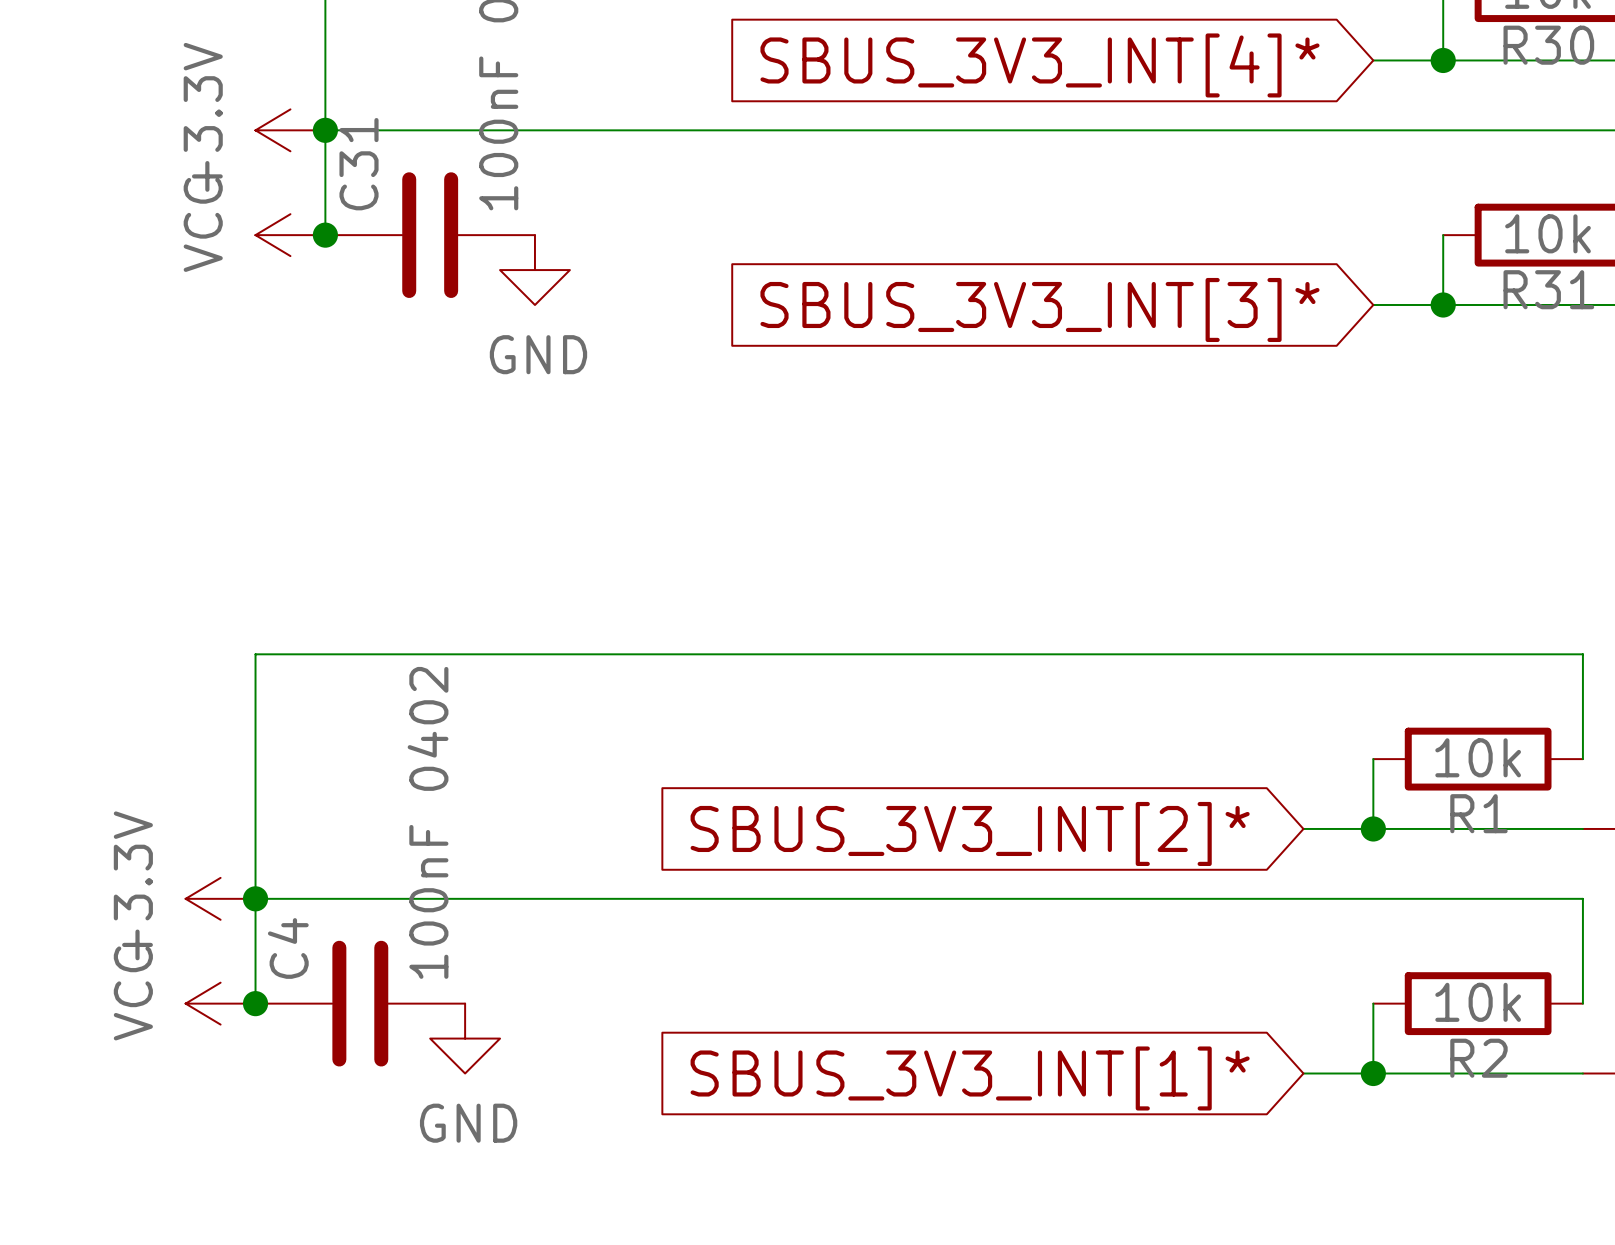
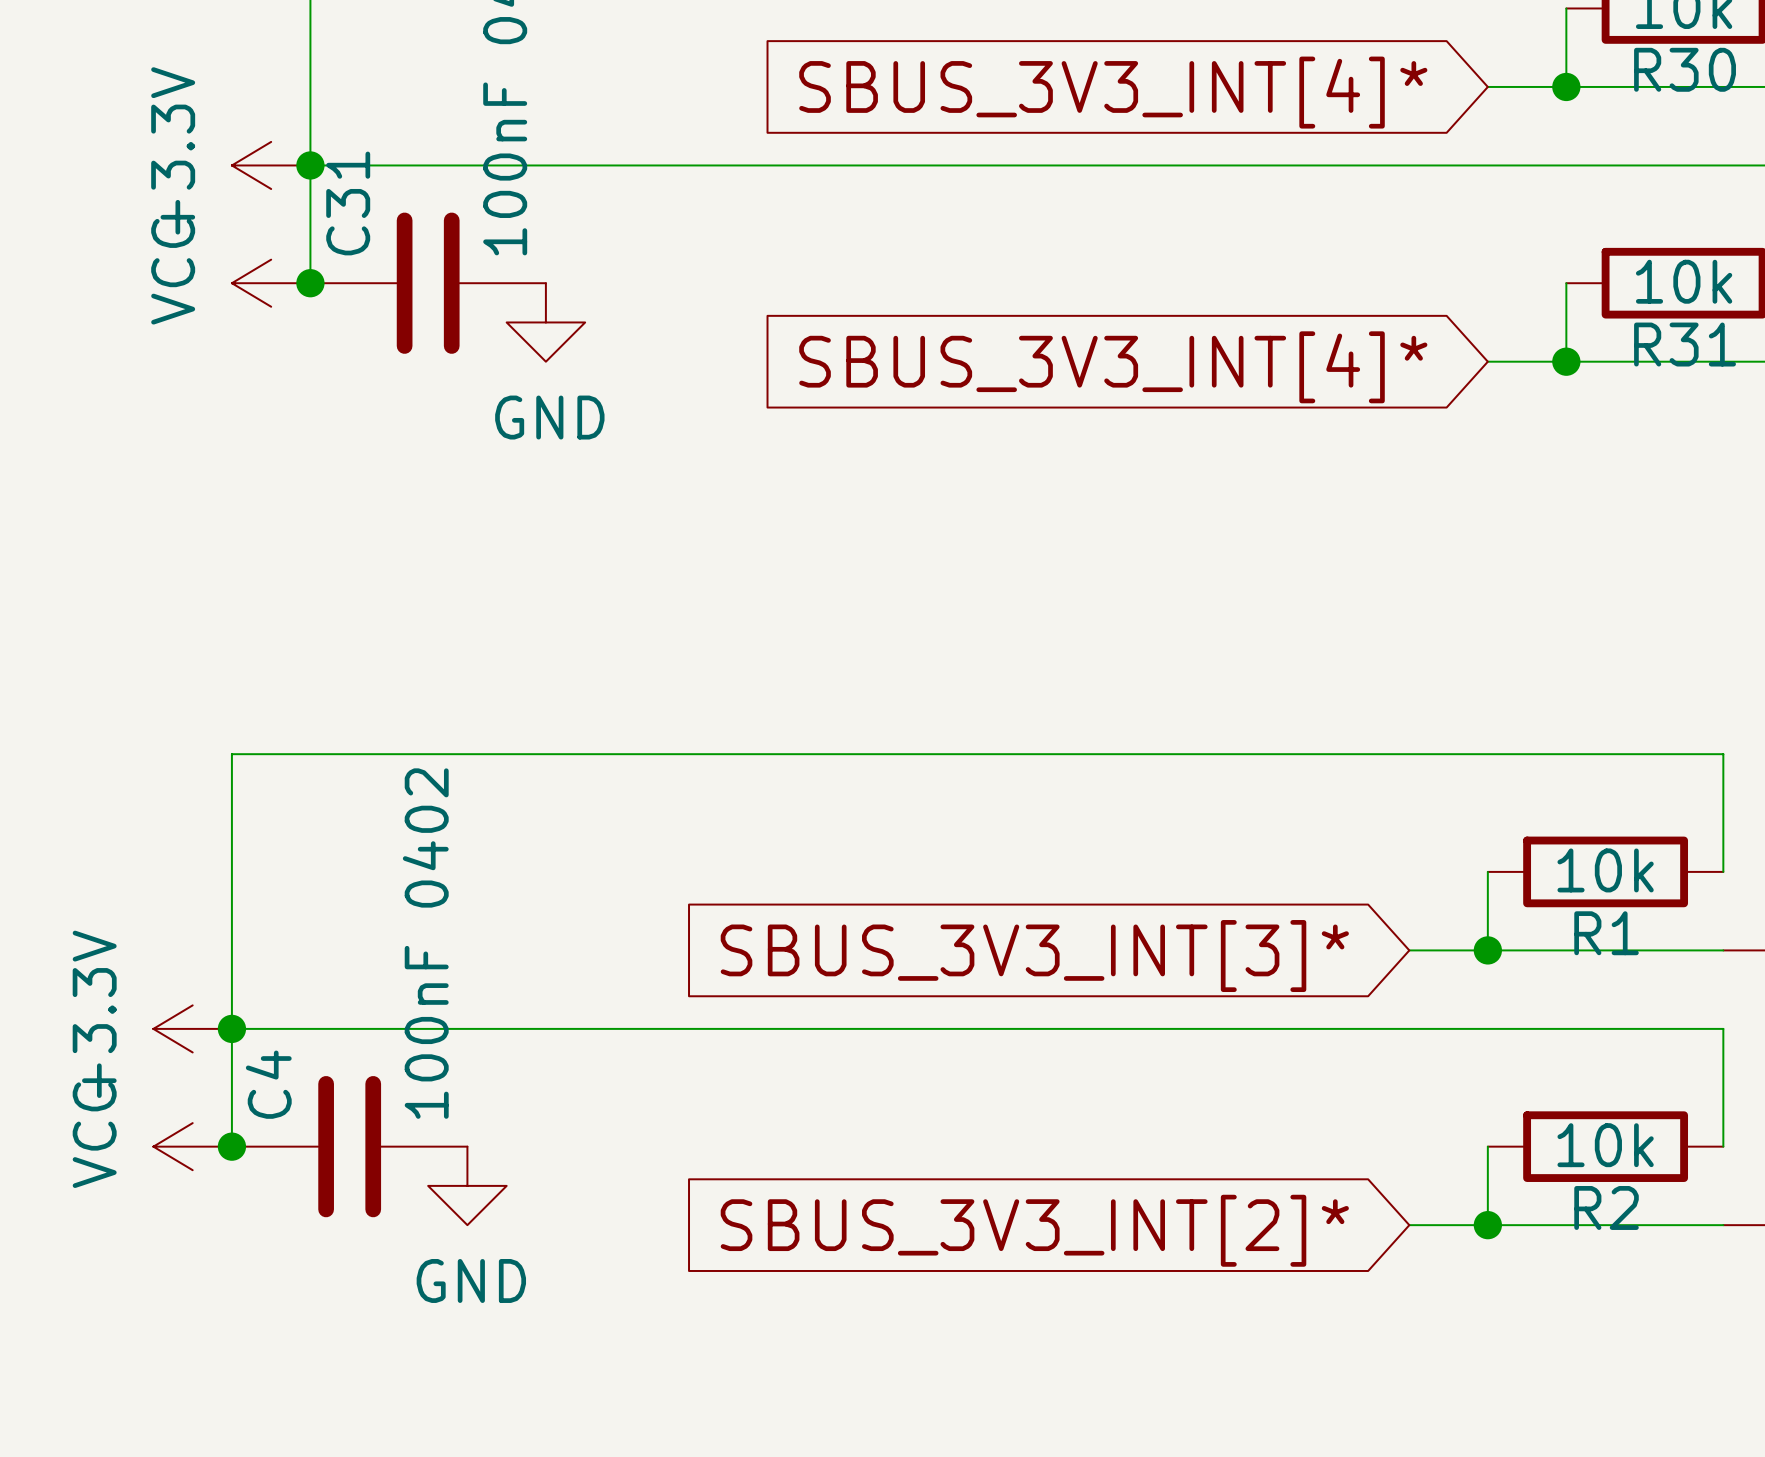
global label: SBUS_3V3_INT[3]* (1039, 309) -> SBUS_3V3_INT[4]* (1113, 367)
global label: SBUS_3V3_INT[2]* (970, 833) -> SBUS_3V3_INT[3]* (1034, 956)
global label: SBUS_3V3_INT[1]* (970, 1078) -> SBUS_3V3_INT[2]* (1034, 1230)

